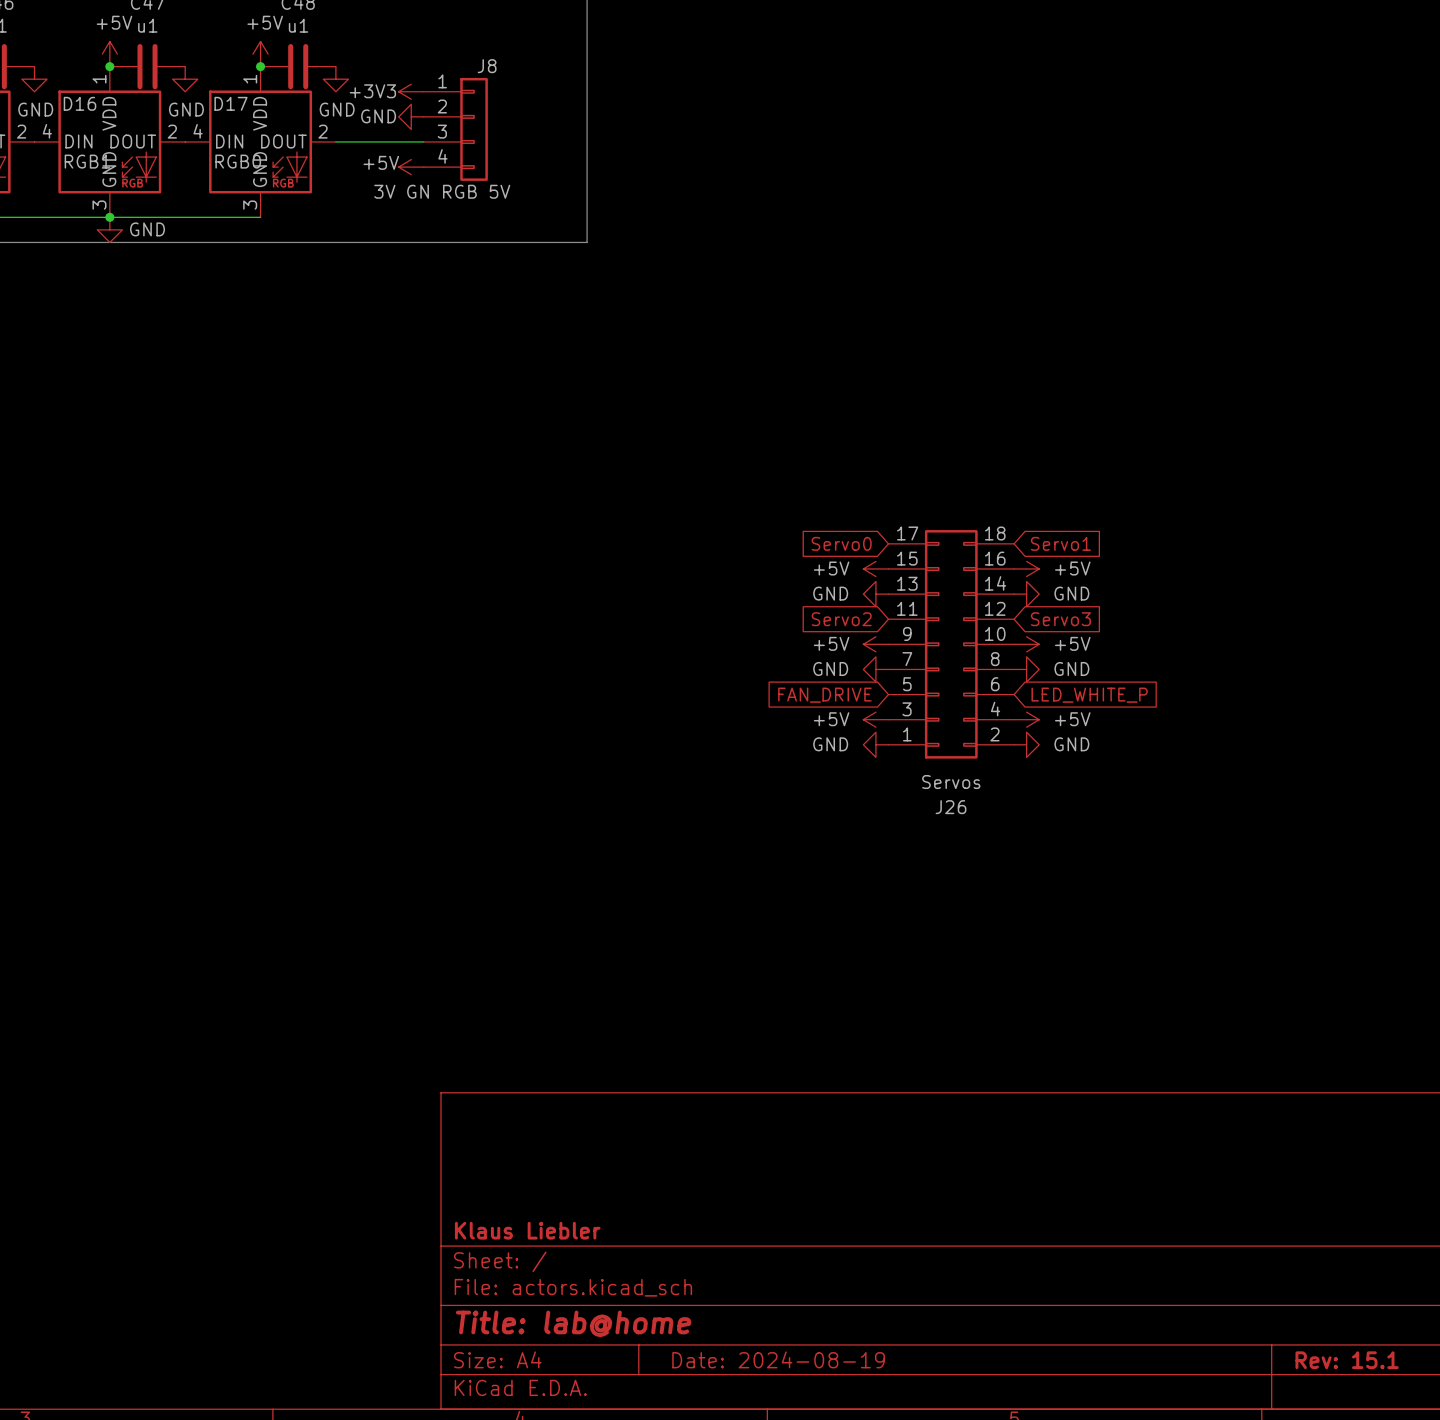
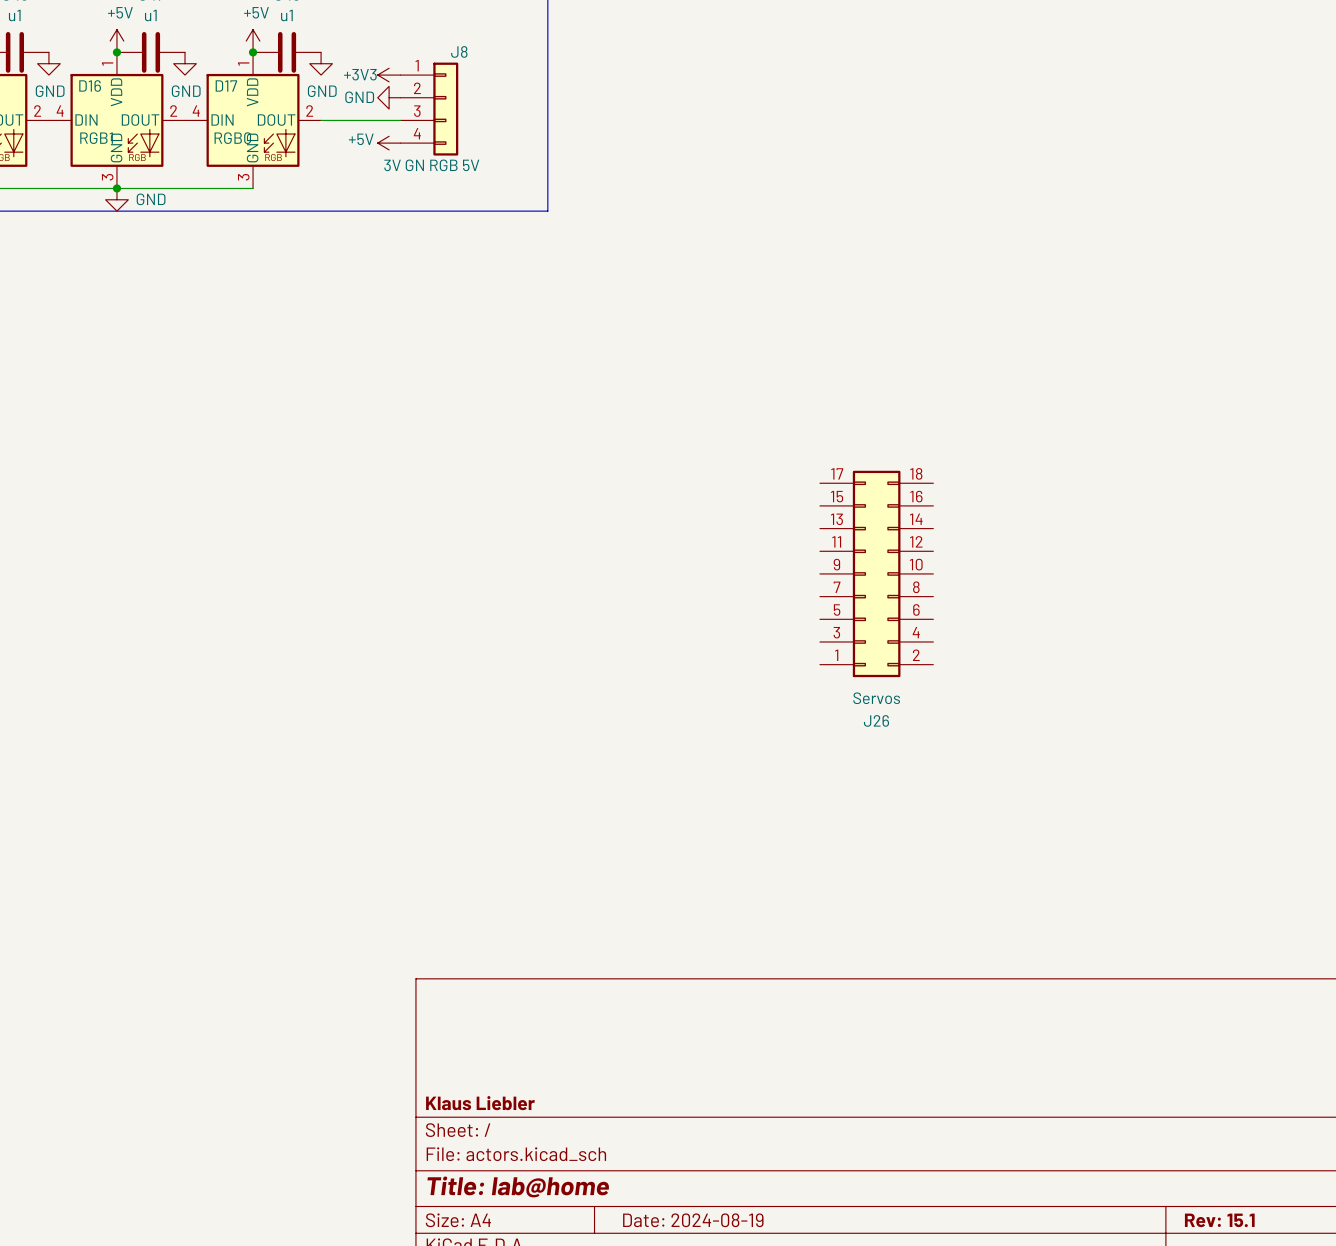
global label: Servo0 (841, 543) -> none
global label: Servo1 (1060, 543) -> none
power symbol: +5V (875, 568) -> none
power symbol: +5V (1026, 568) -> none
power symbol: GND (875, 594) -> none
power symbol: GND (1026, 594) -> none
global label: Servo2 (841, 619) -> none
global label: Servo3 (1060, 619) -> none
power symbol: +5V (875, 644) -> none
power symbol: +5V (1026, 644) -> none
power symbol: GND (875, 669) -> none
power symbol: GND (1026, 669) -> none
global label: FAN_DRIVE (824, 695) -> none
global label: LED_WHITE_P (1089, 695) -> none
power symbol: +5V (875, 719) -> none
power symbol: +5V (1026, 719) -> none
power symbol: GND (875, 744) -> none
power symbol: GND (1026, 744) -> none

